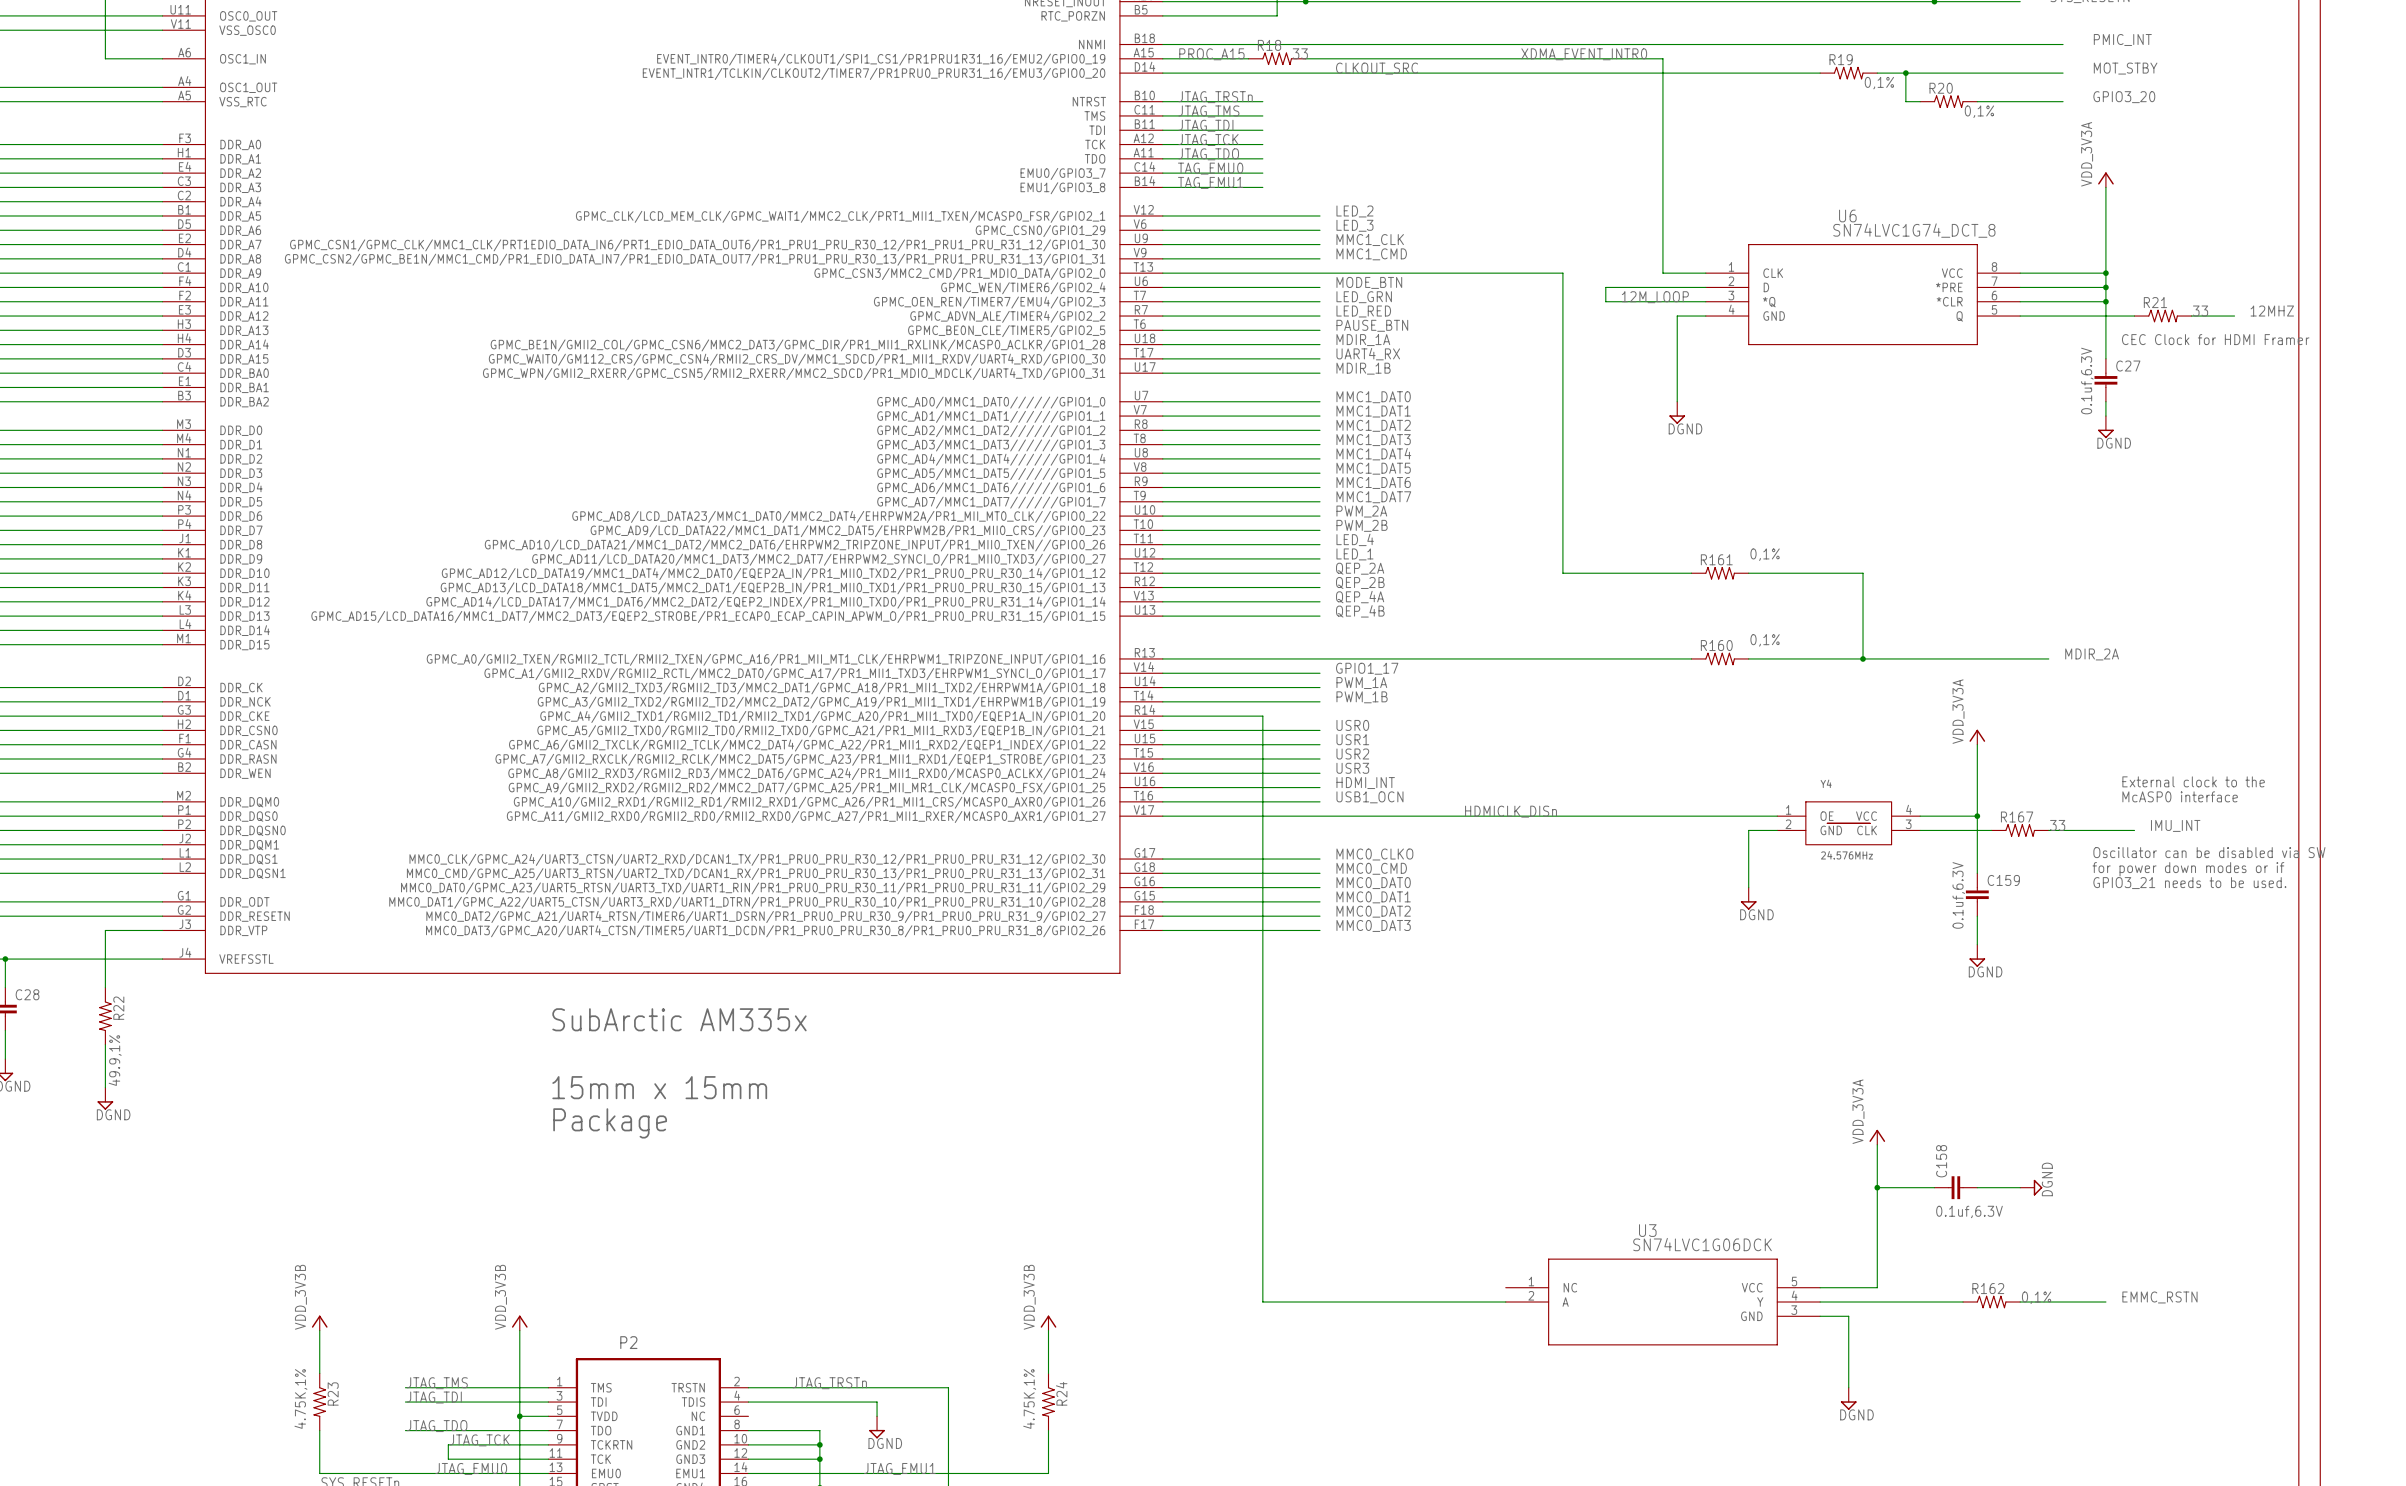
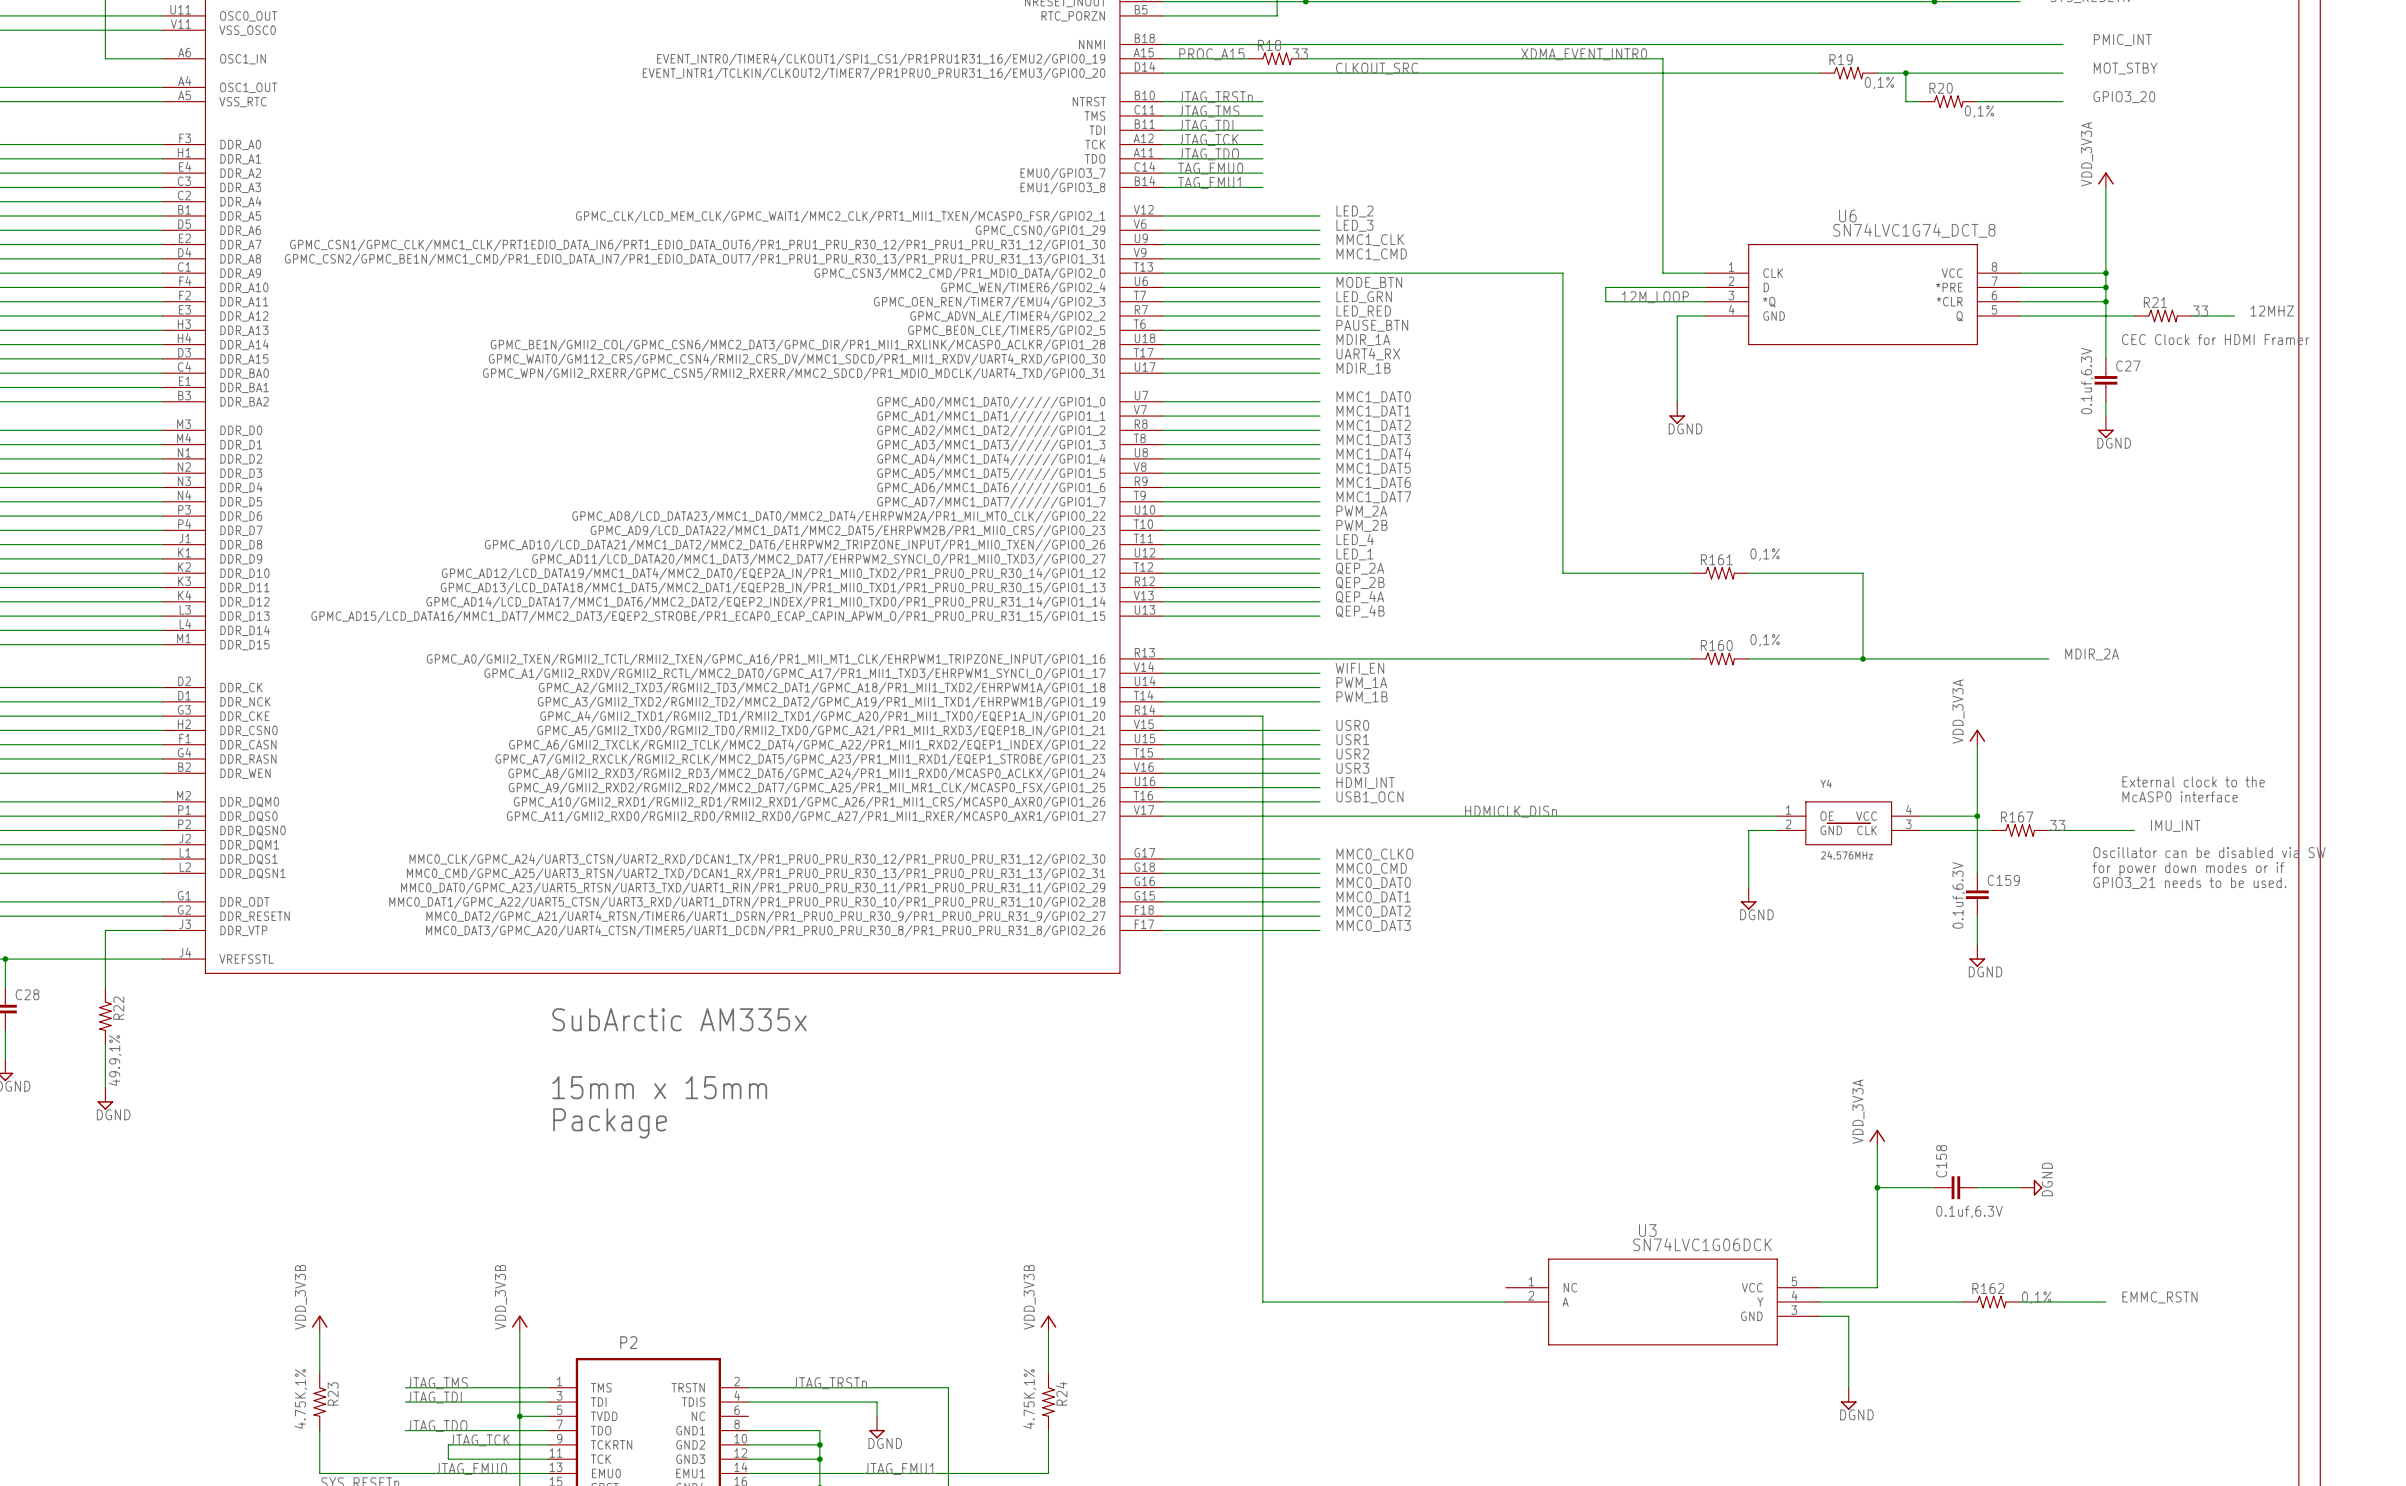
label: GPIO1_17 (1367, 668) -> WIFI_EN (1359, 668)

